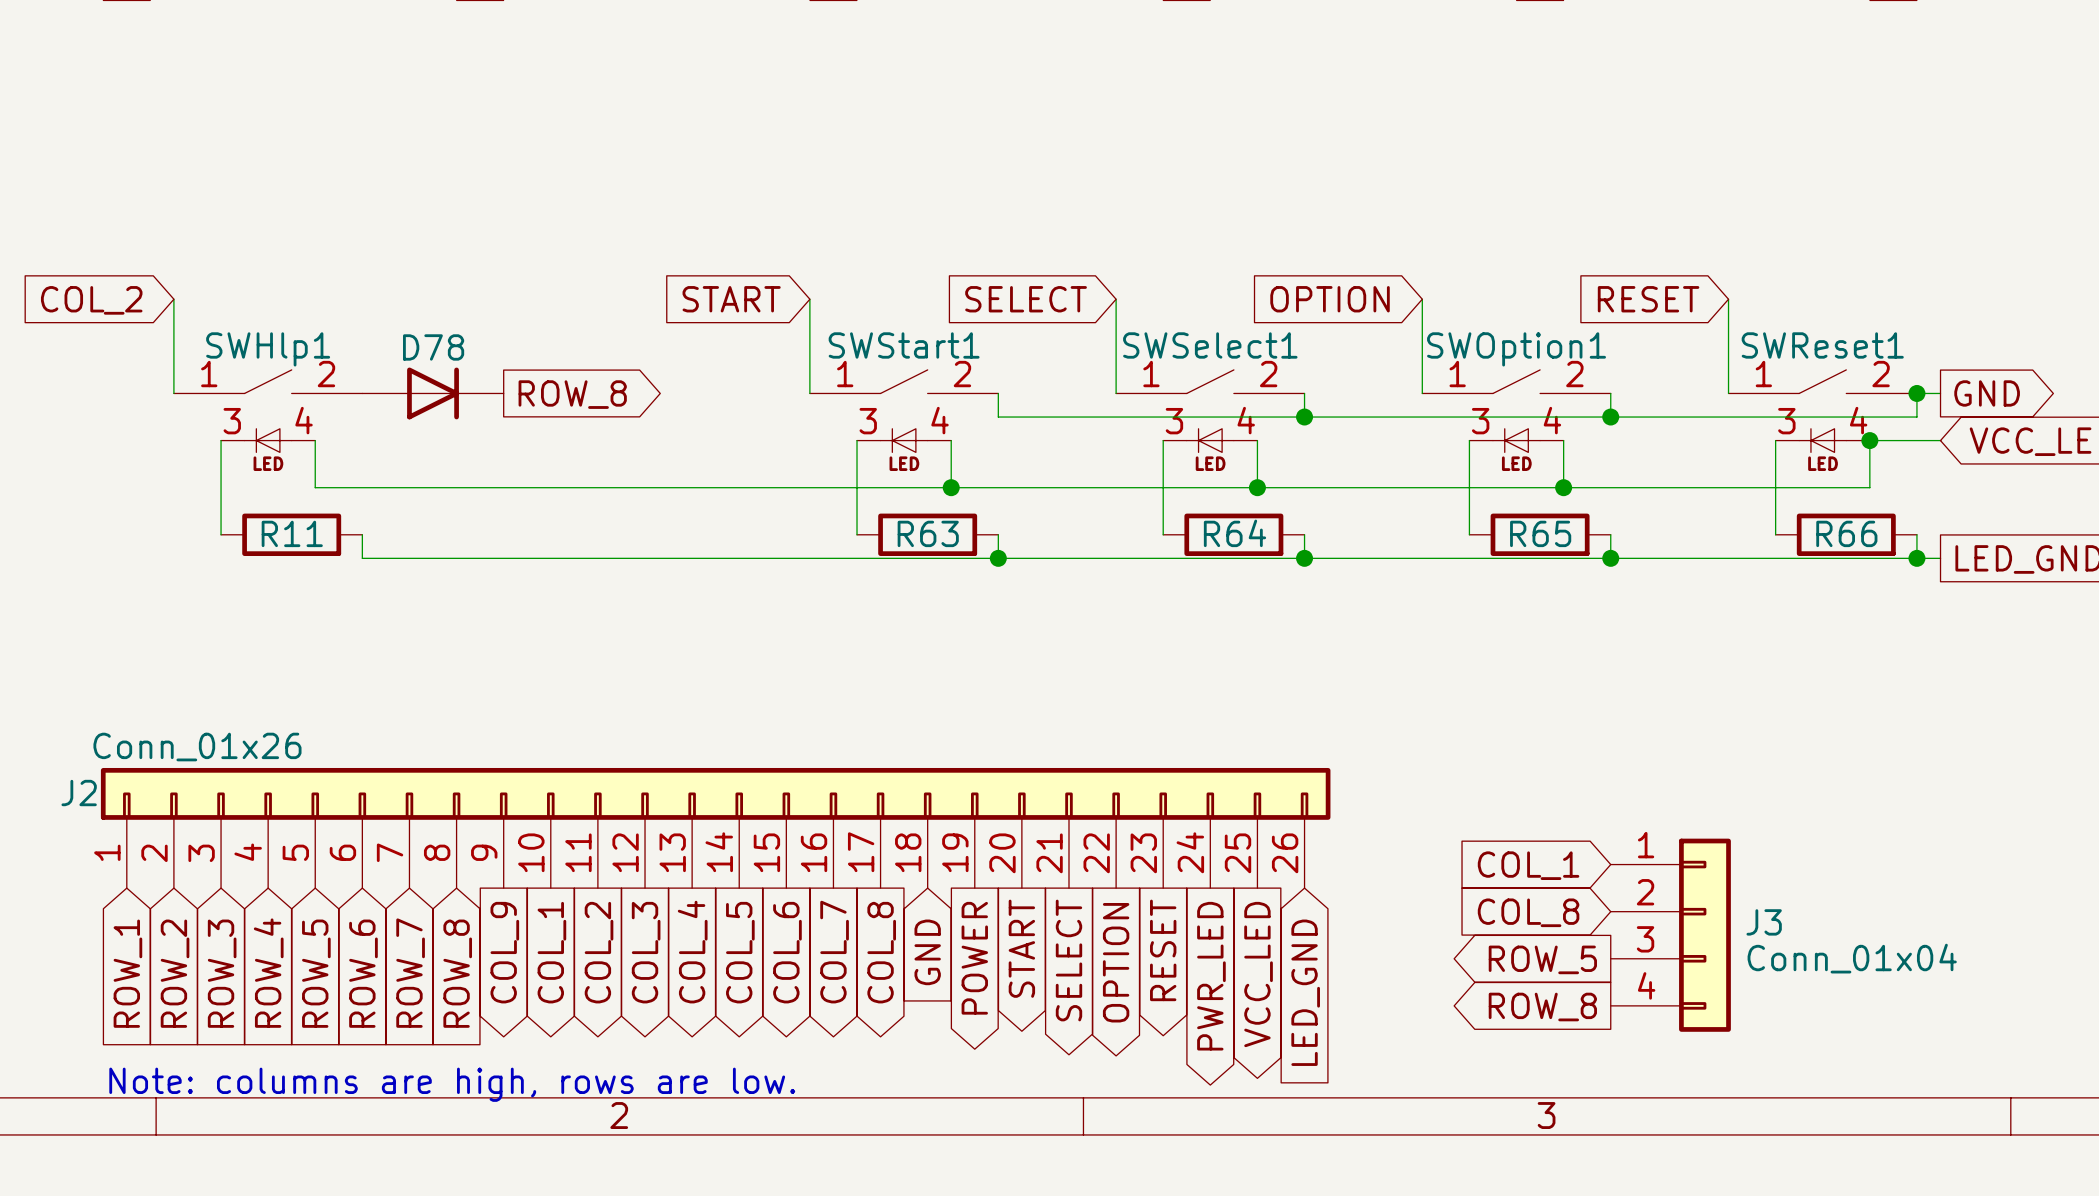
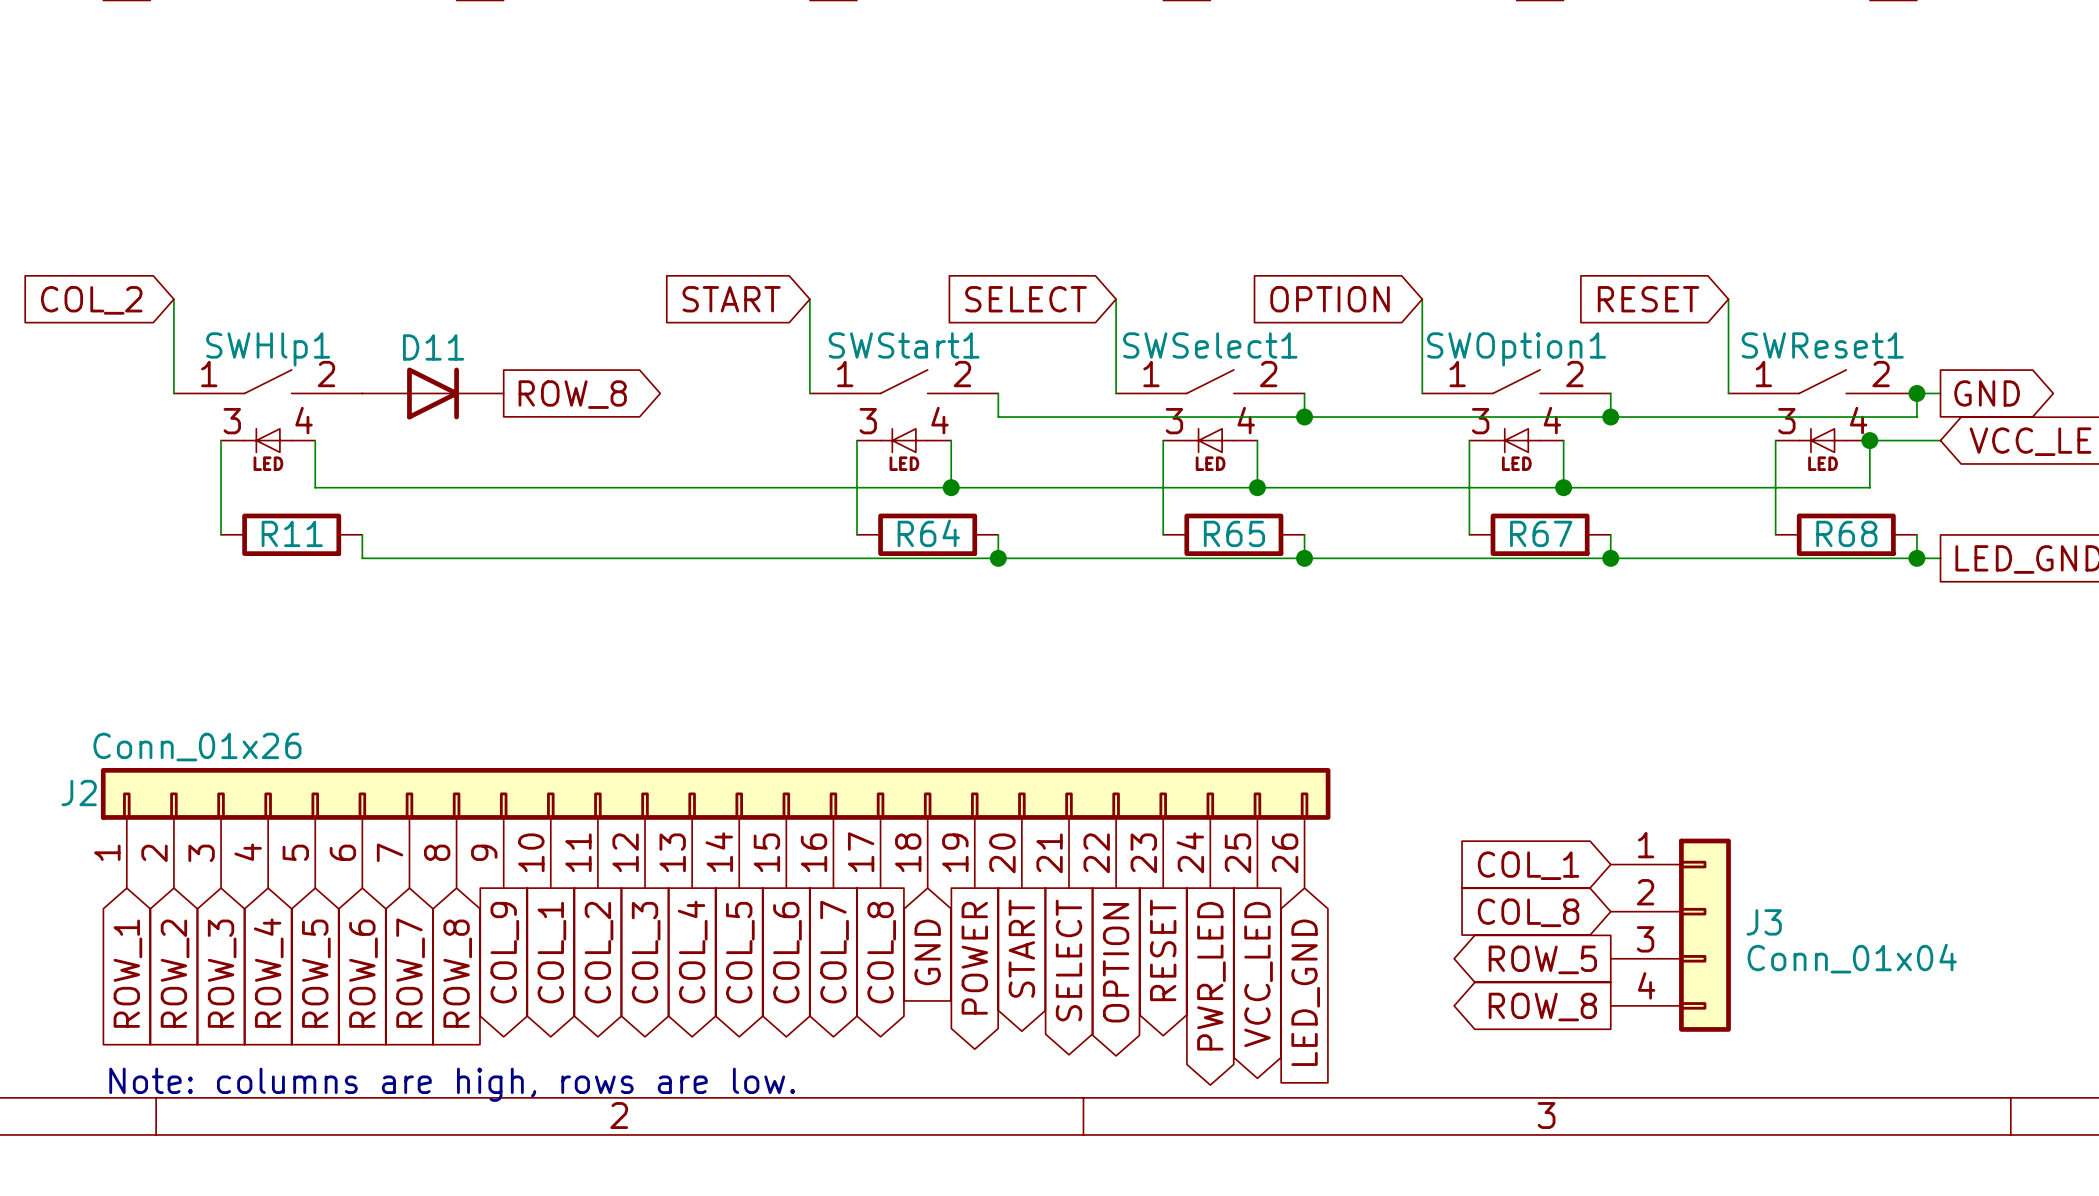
D78 name: D78 (433, 347) -> D11 (433, 347)
R63 name: R63 (928, 533) -> R64 (928, 533)
R64 name: R64 (1235, 533) -> R65 (1234, 533)
R65 name: R65 (1540, 533) -> R67 (1541, 533)
R66 name: R66 (1846, 533) -> R68 (1846, 533)

